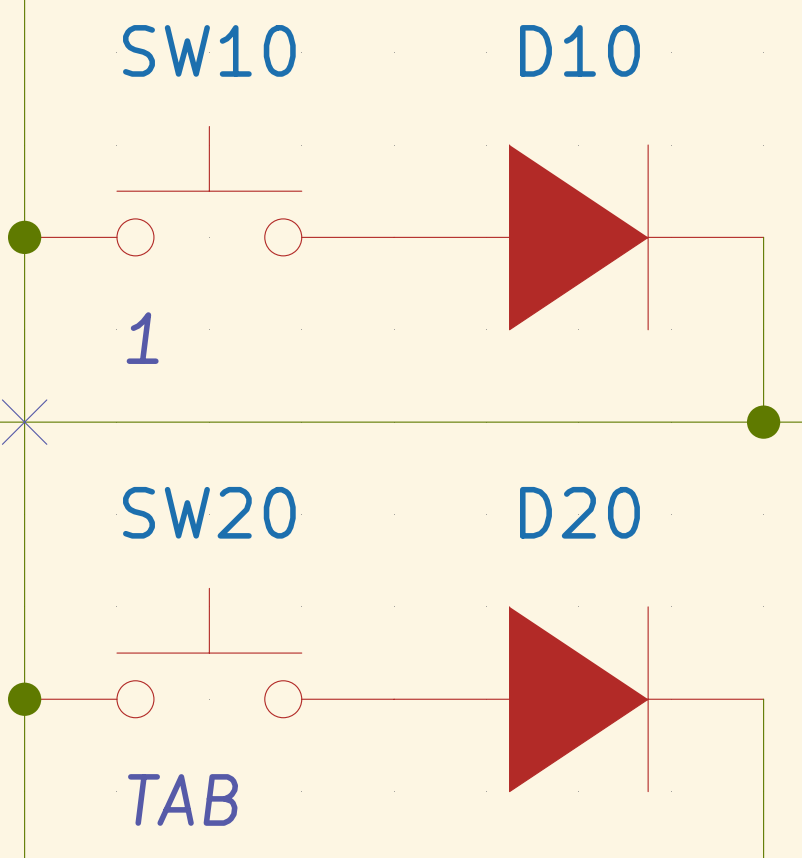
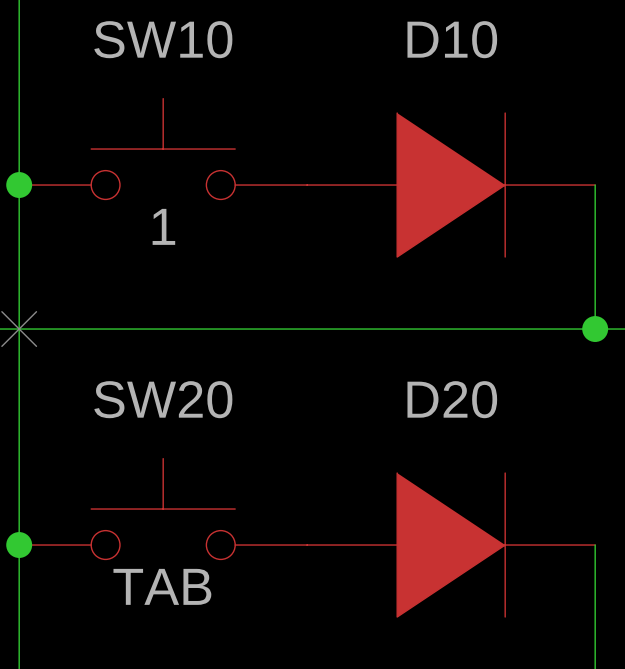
SW10 value: none -> 1 (163, 226)
text: 1 (142, 338) -> none
SW20 value: none -> TAB (162, 586)
text: TAB (183, 799) -> none

